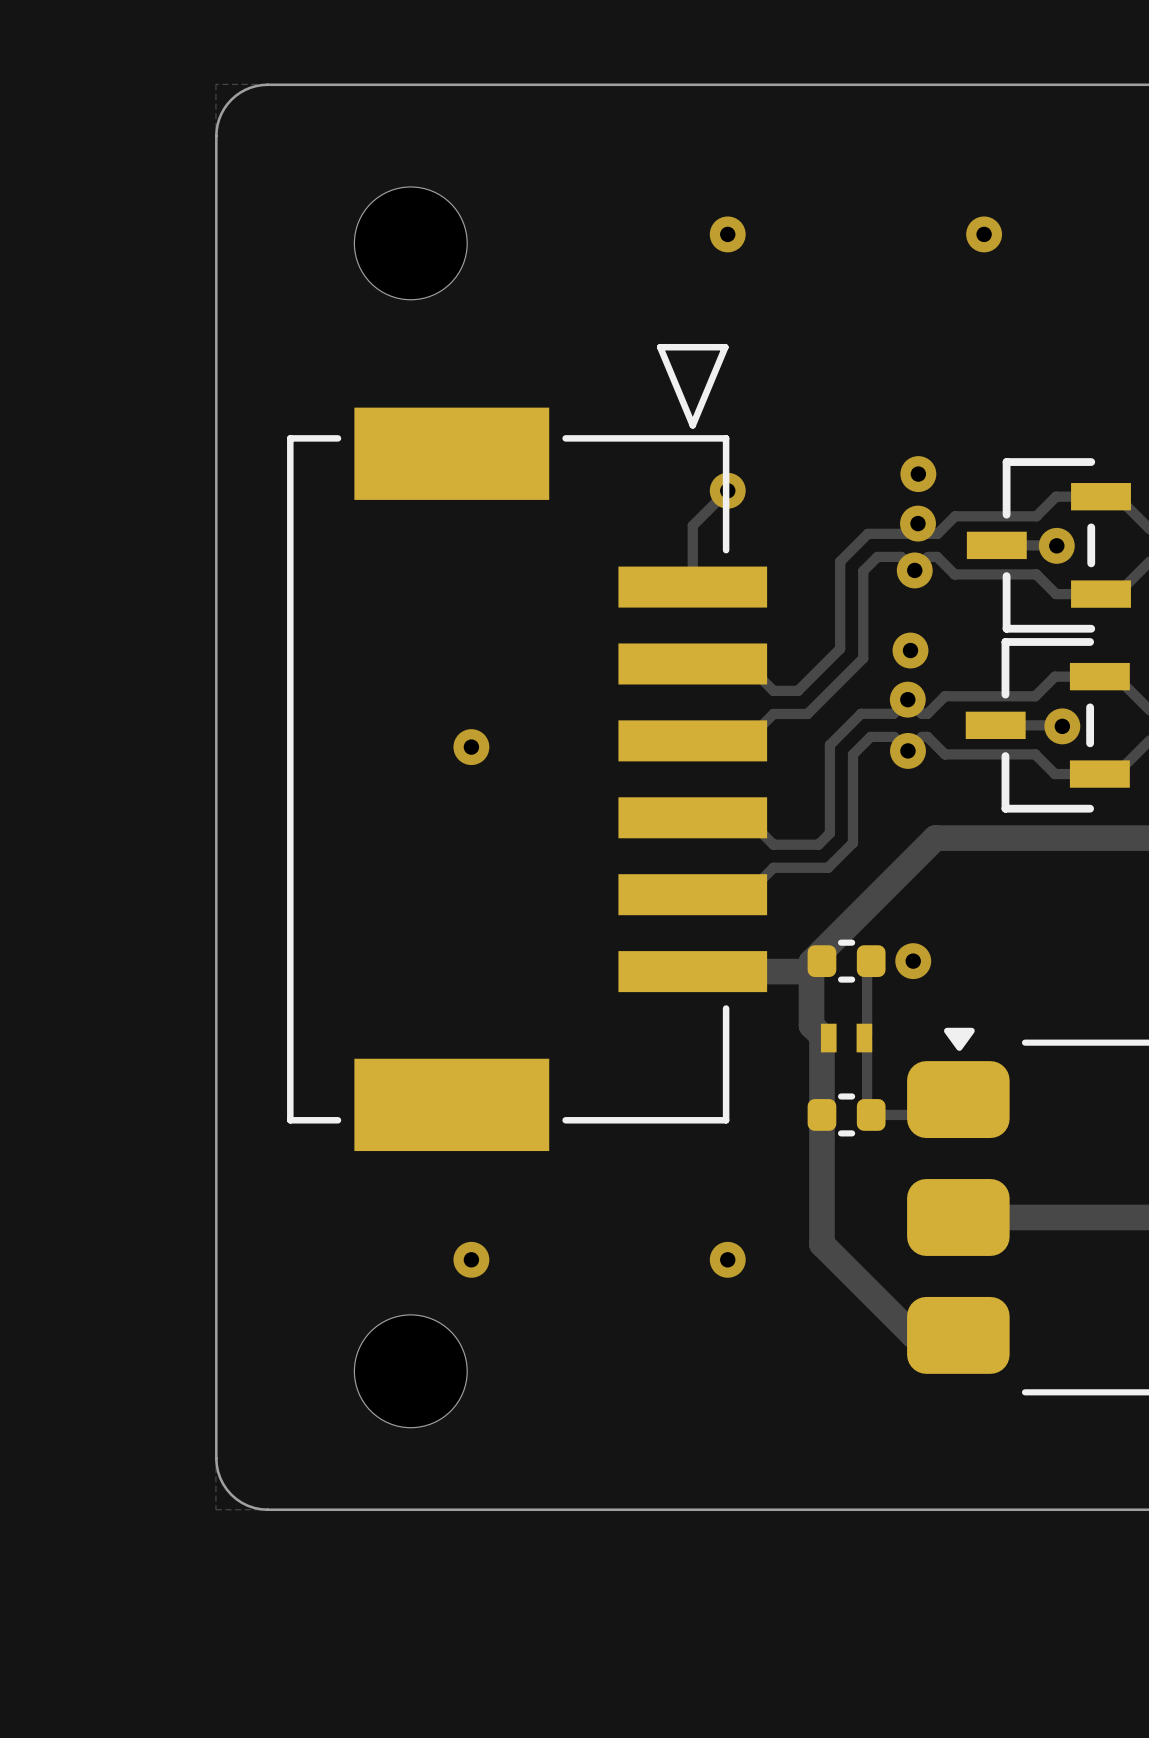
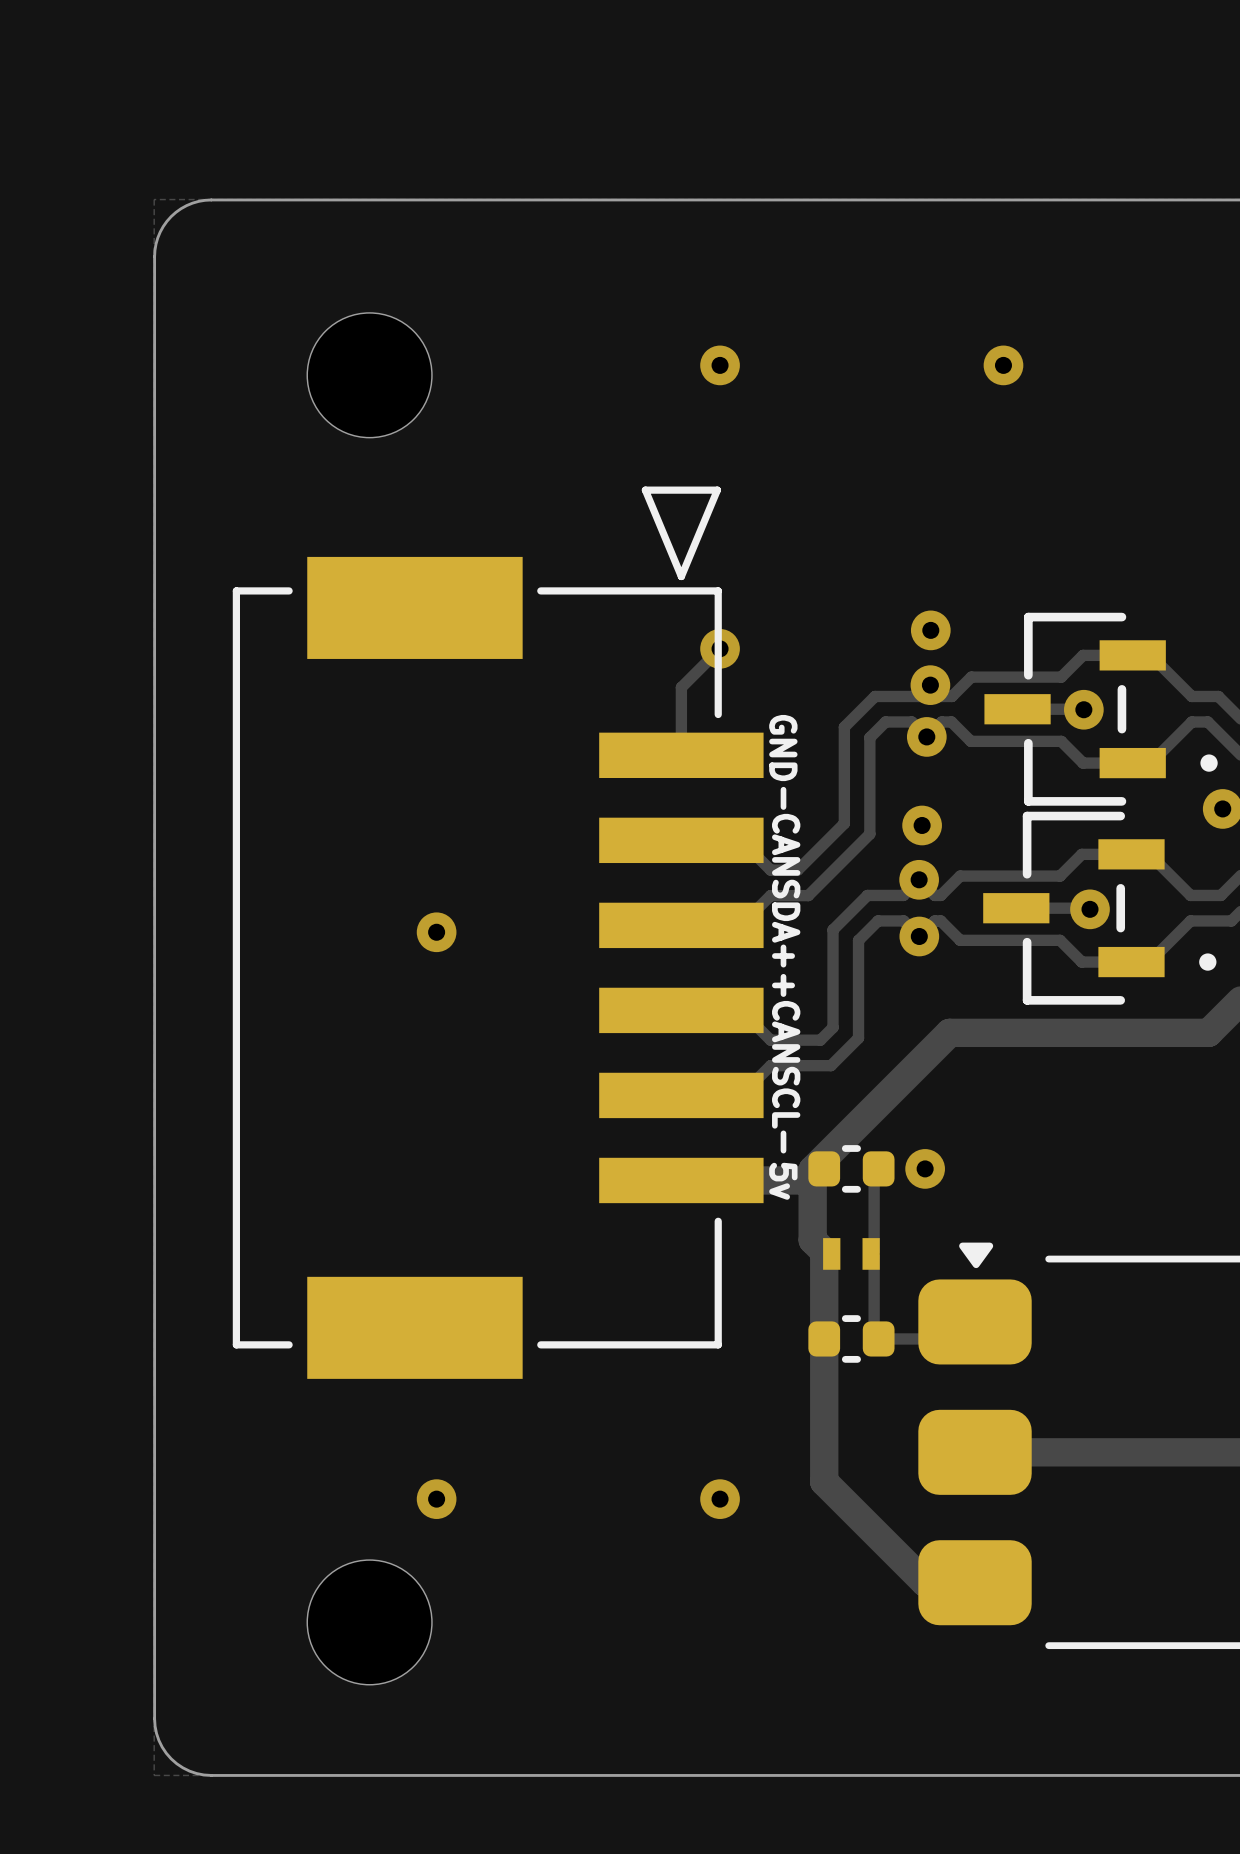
text: none -> GND (783, 748)
text: none -> -CANSDA+ (786, 877)
text: none -> +CANSCL- (786, 1063)
text: none -> 5v (783, 1181)

